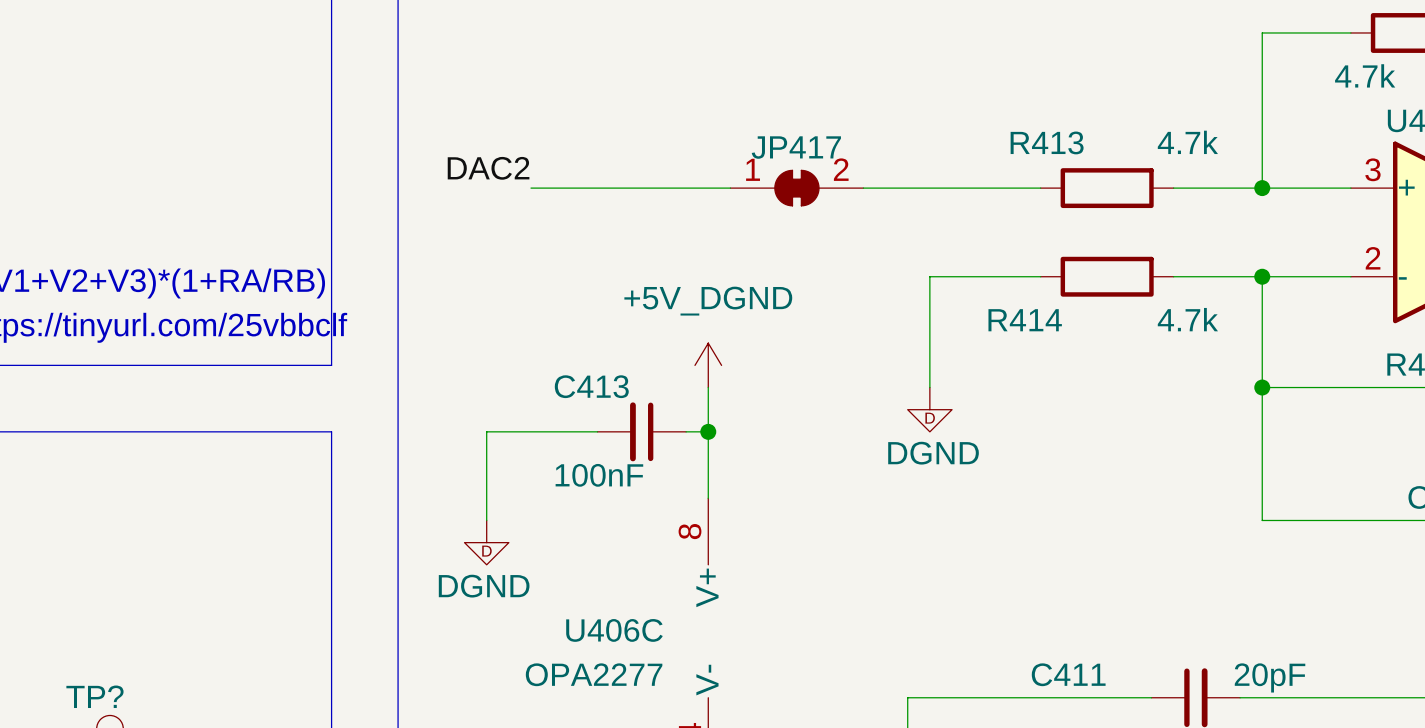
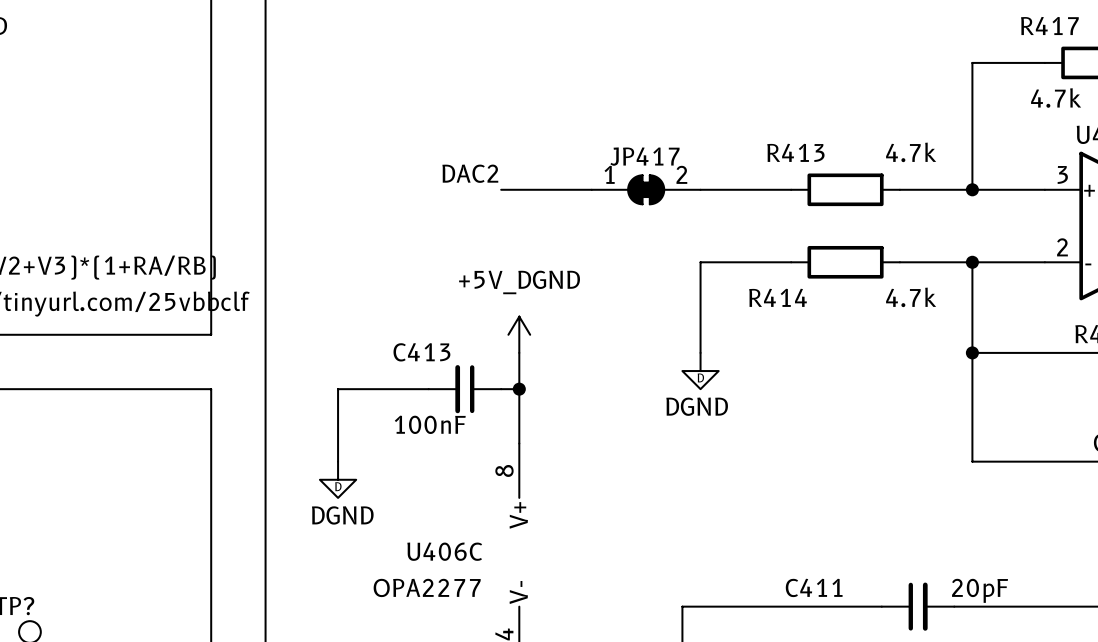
label position: DAC2 (488, 168) -> DAC2 (470, 173)
wire: (531, 188) (686, 188) -> none
JP417 position: (796, 188) -> (646, 189)

